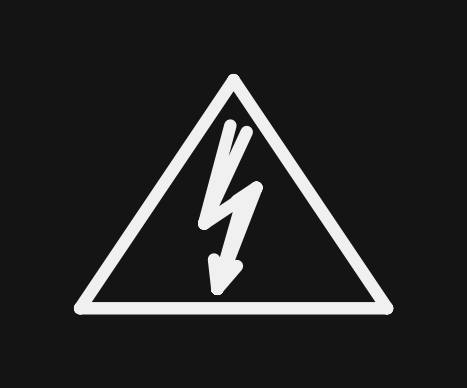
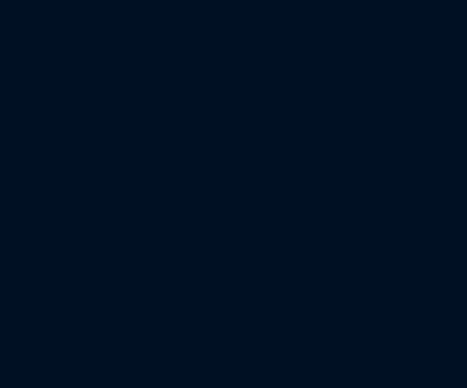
drawing: [73, 73, 394, 315] -> none

